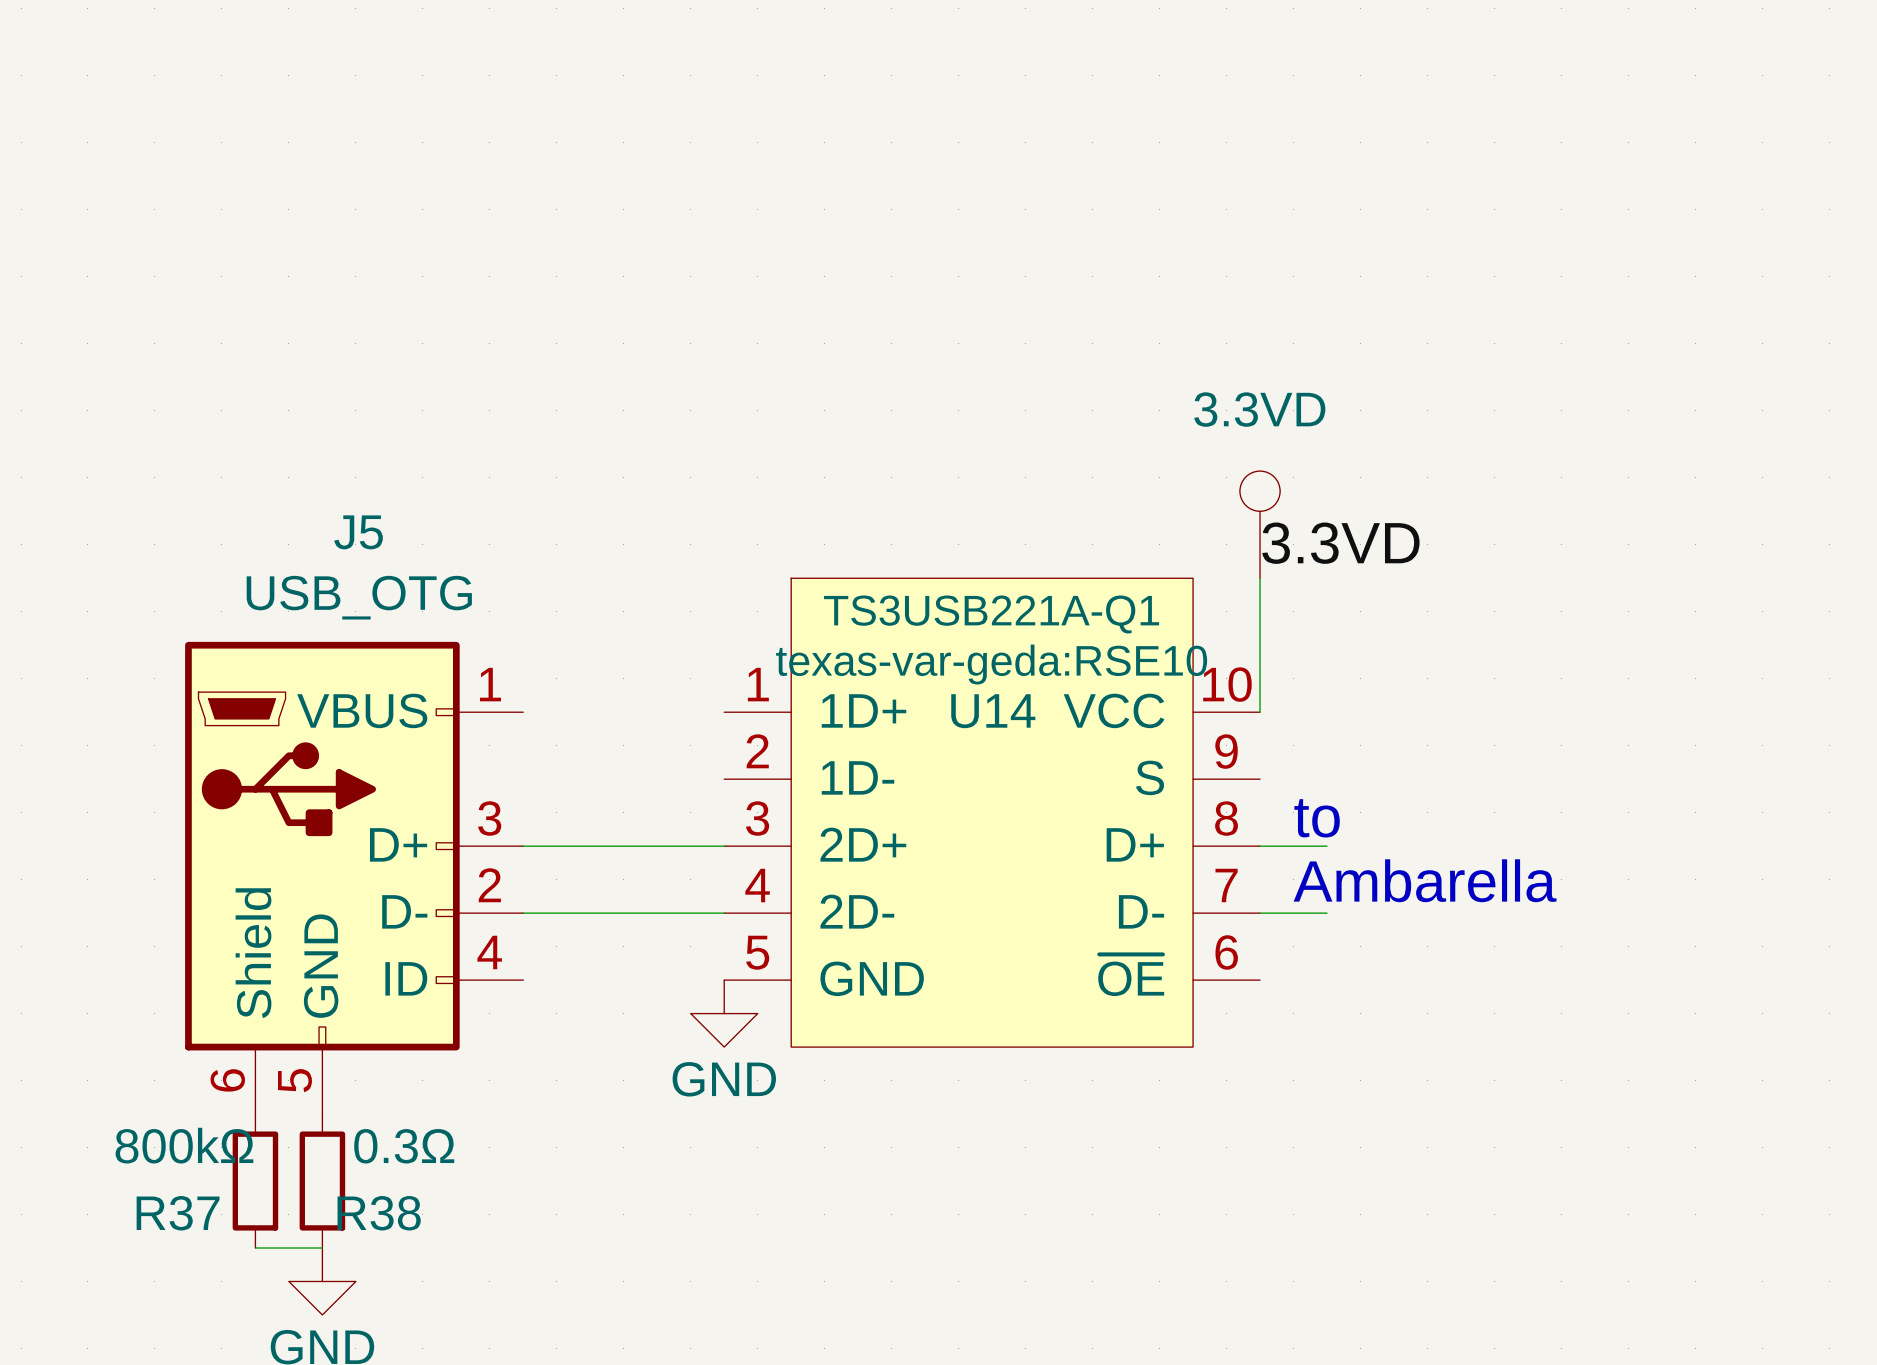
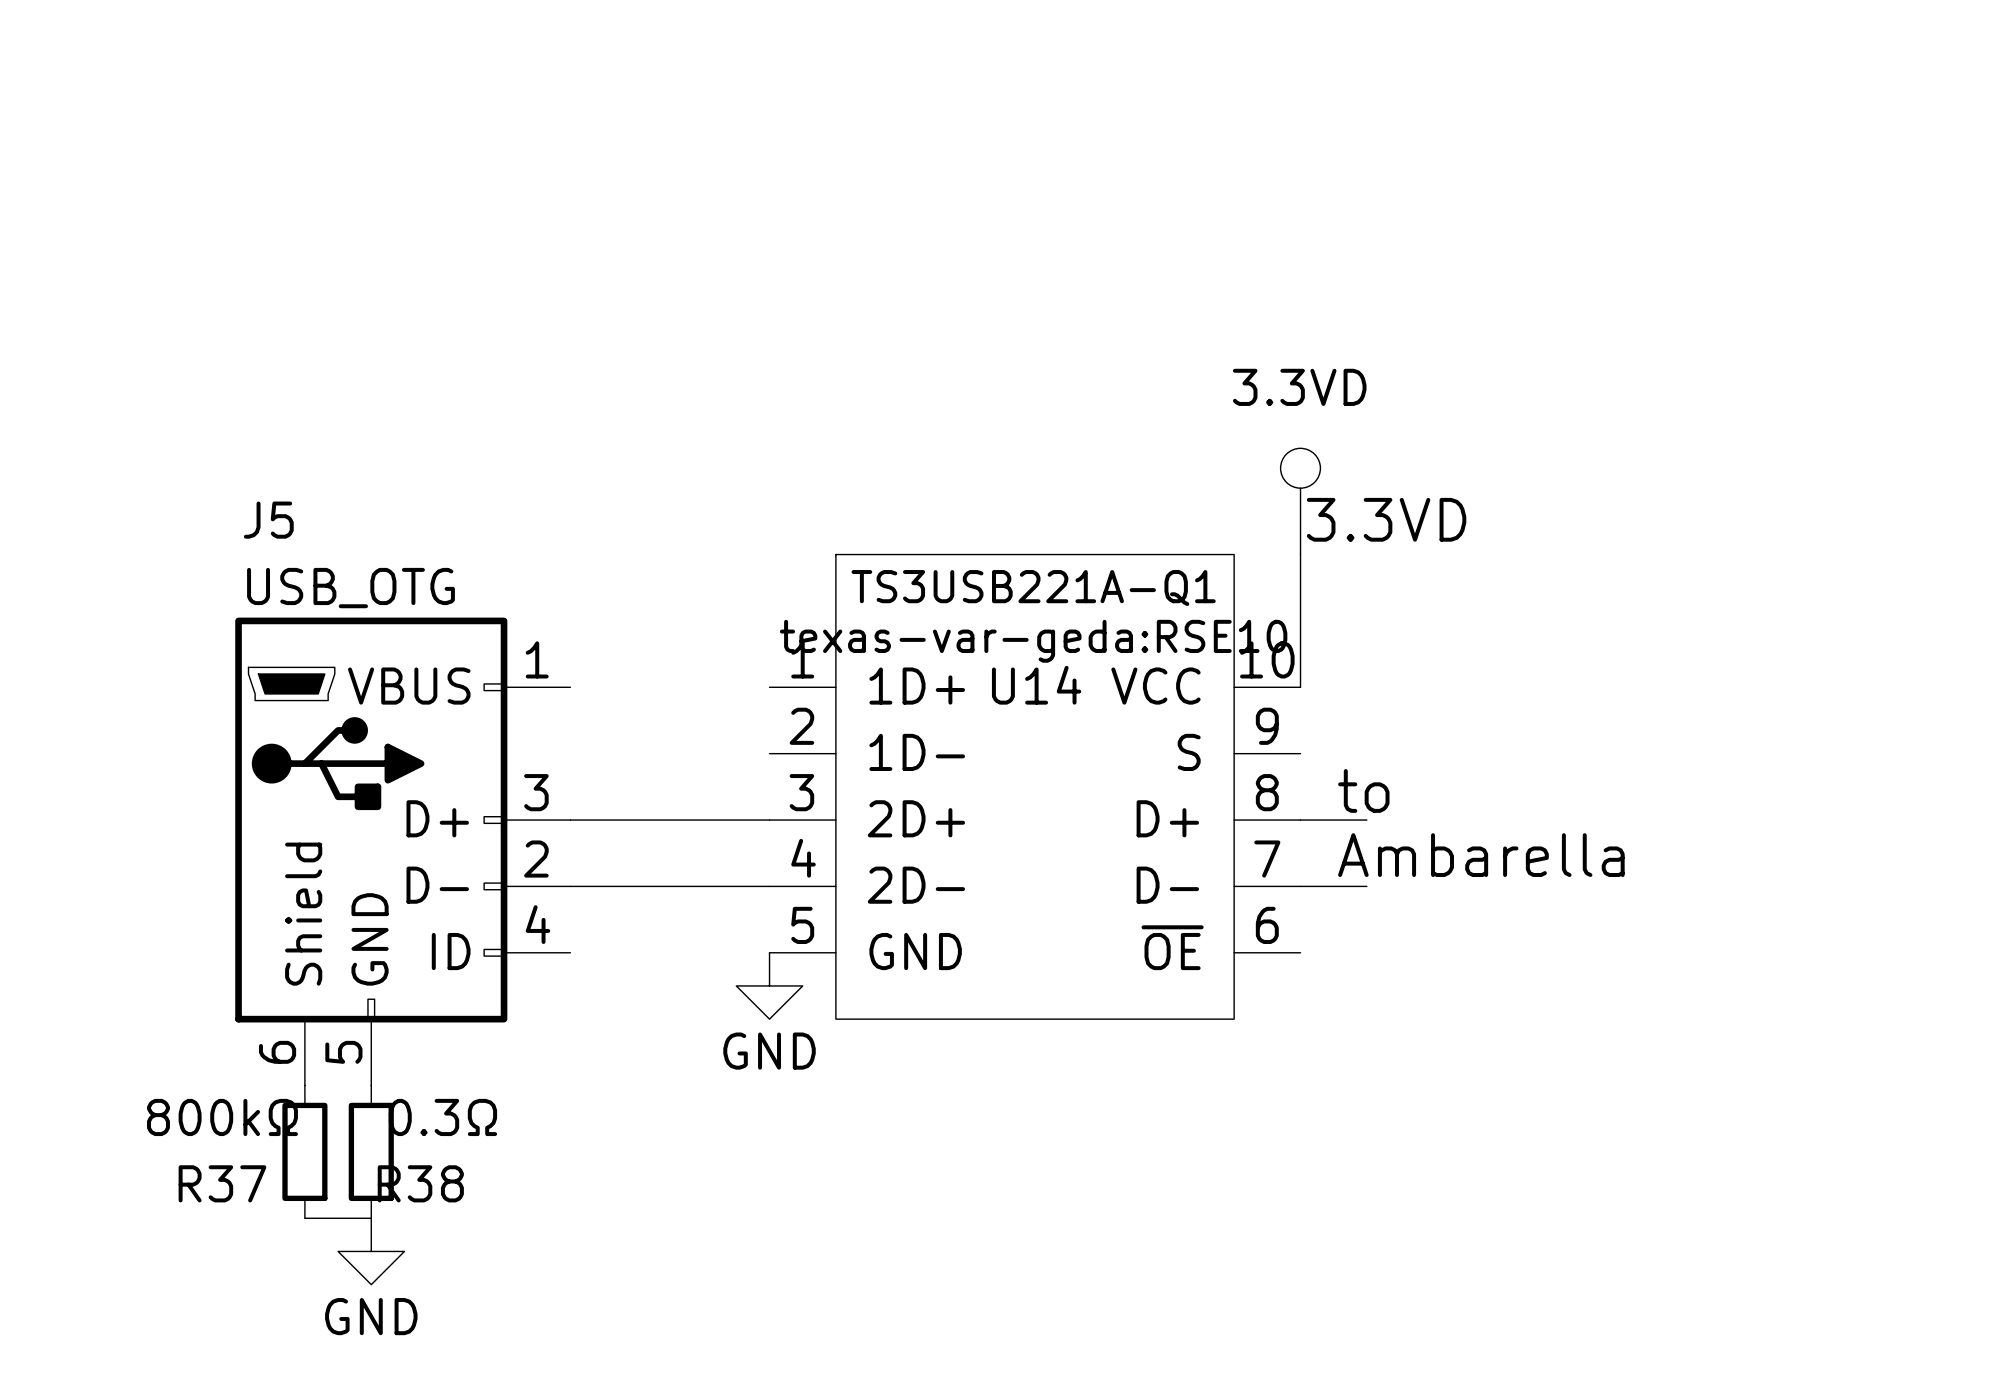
J5 name position: J5 (358, 532) -> J5 (268, 520)
J5 value position: USB_OTG (359, 597) -> USB_OTG (350, 588)

